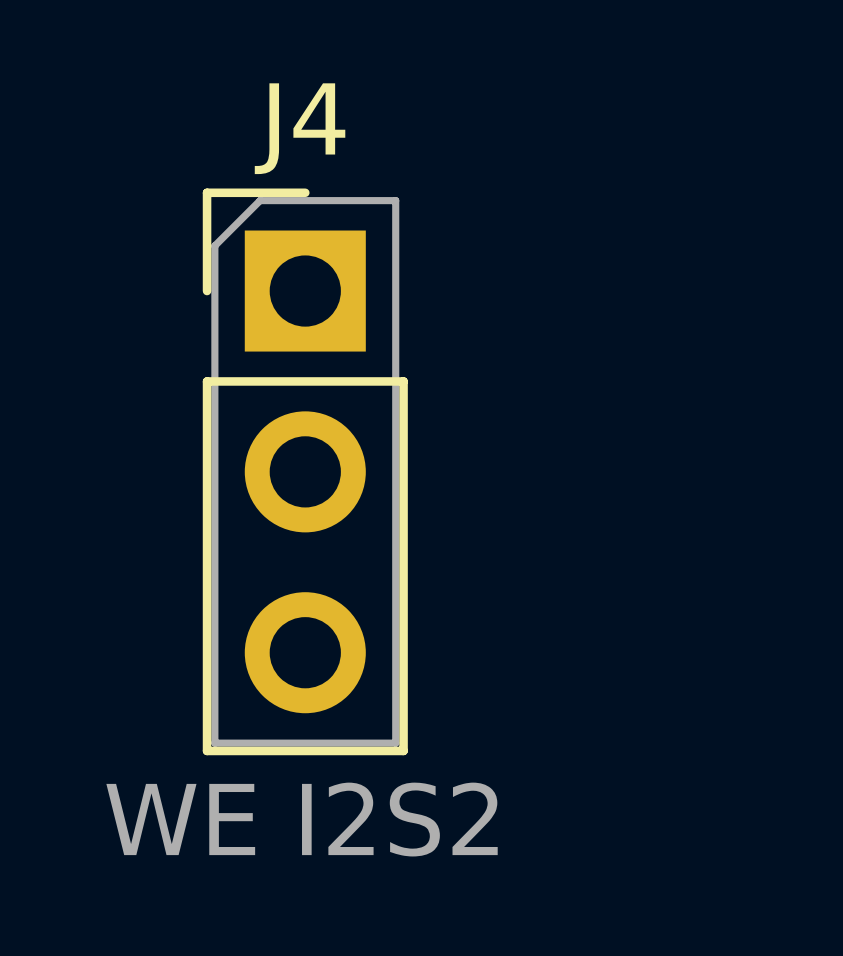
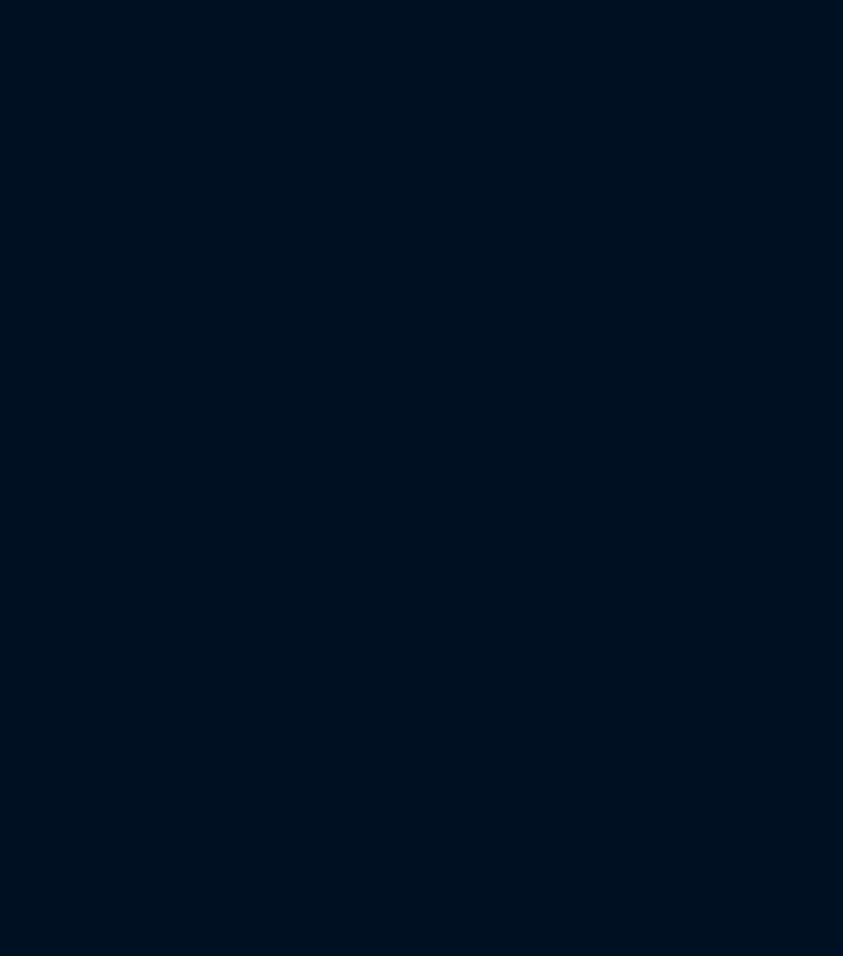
J4: WE I2S2 (305, 471) -> none

